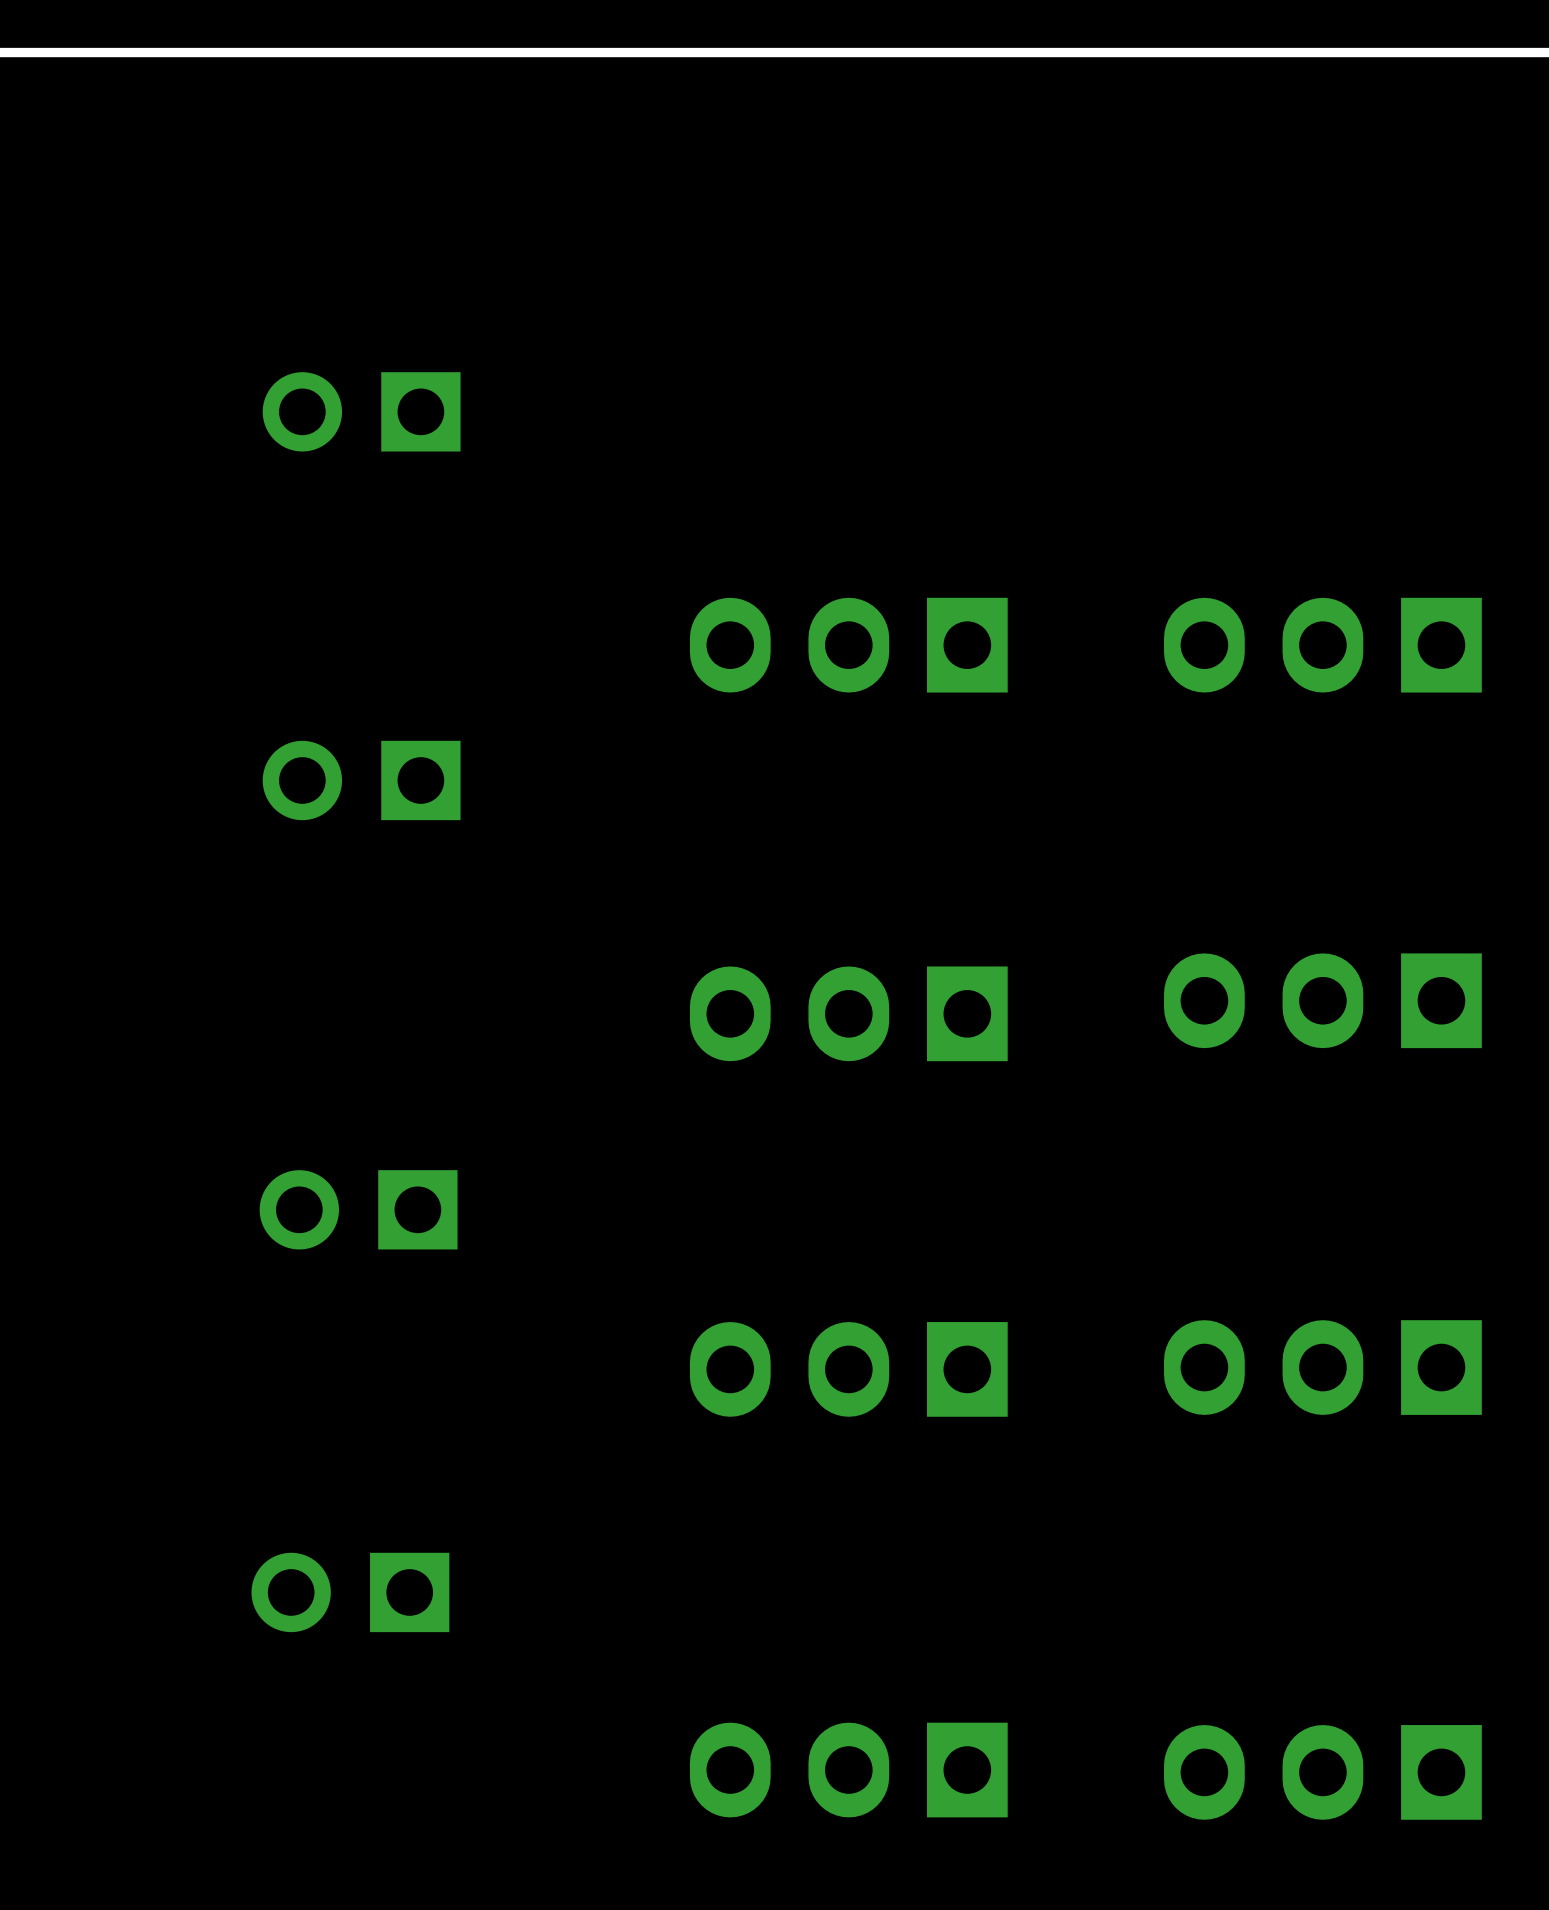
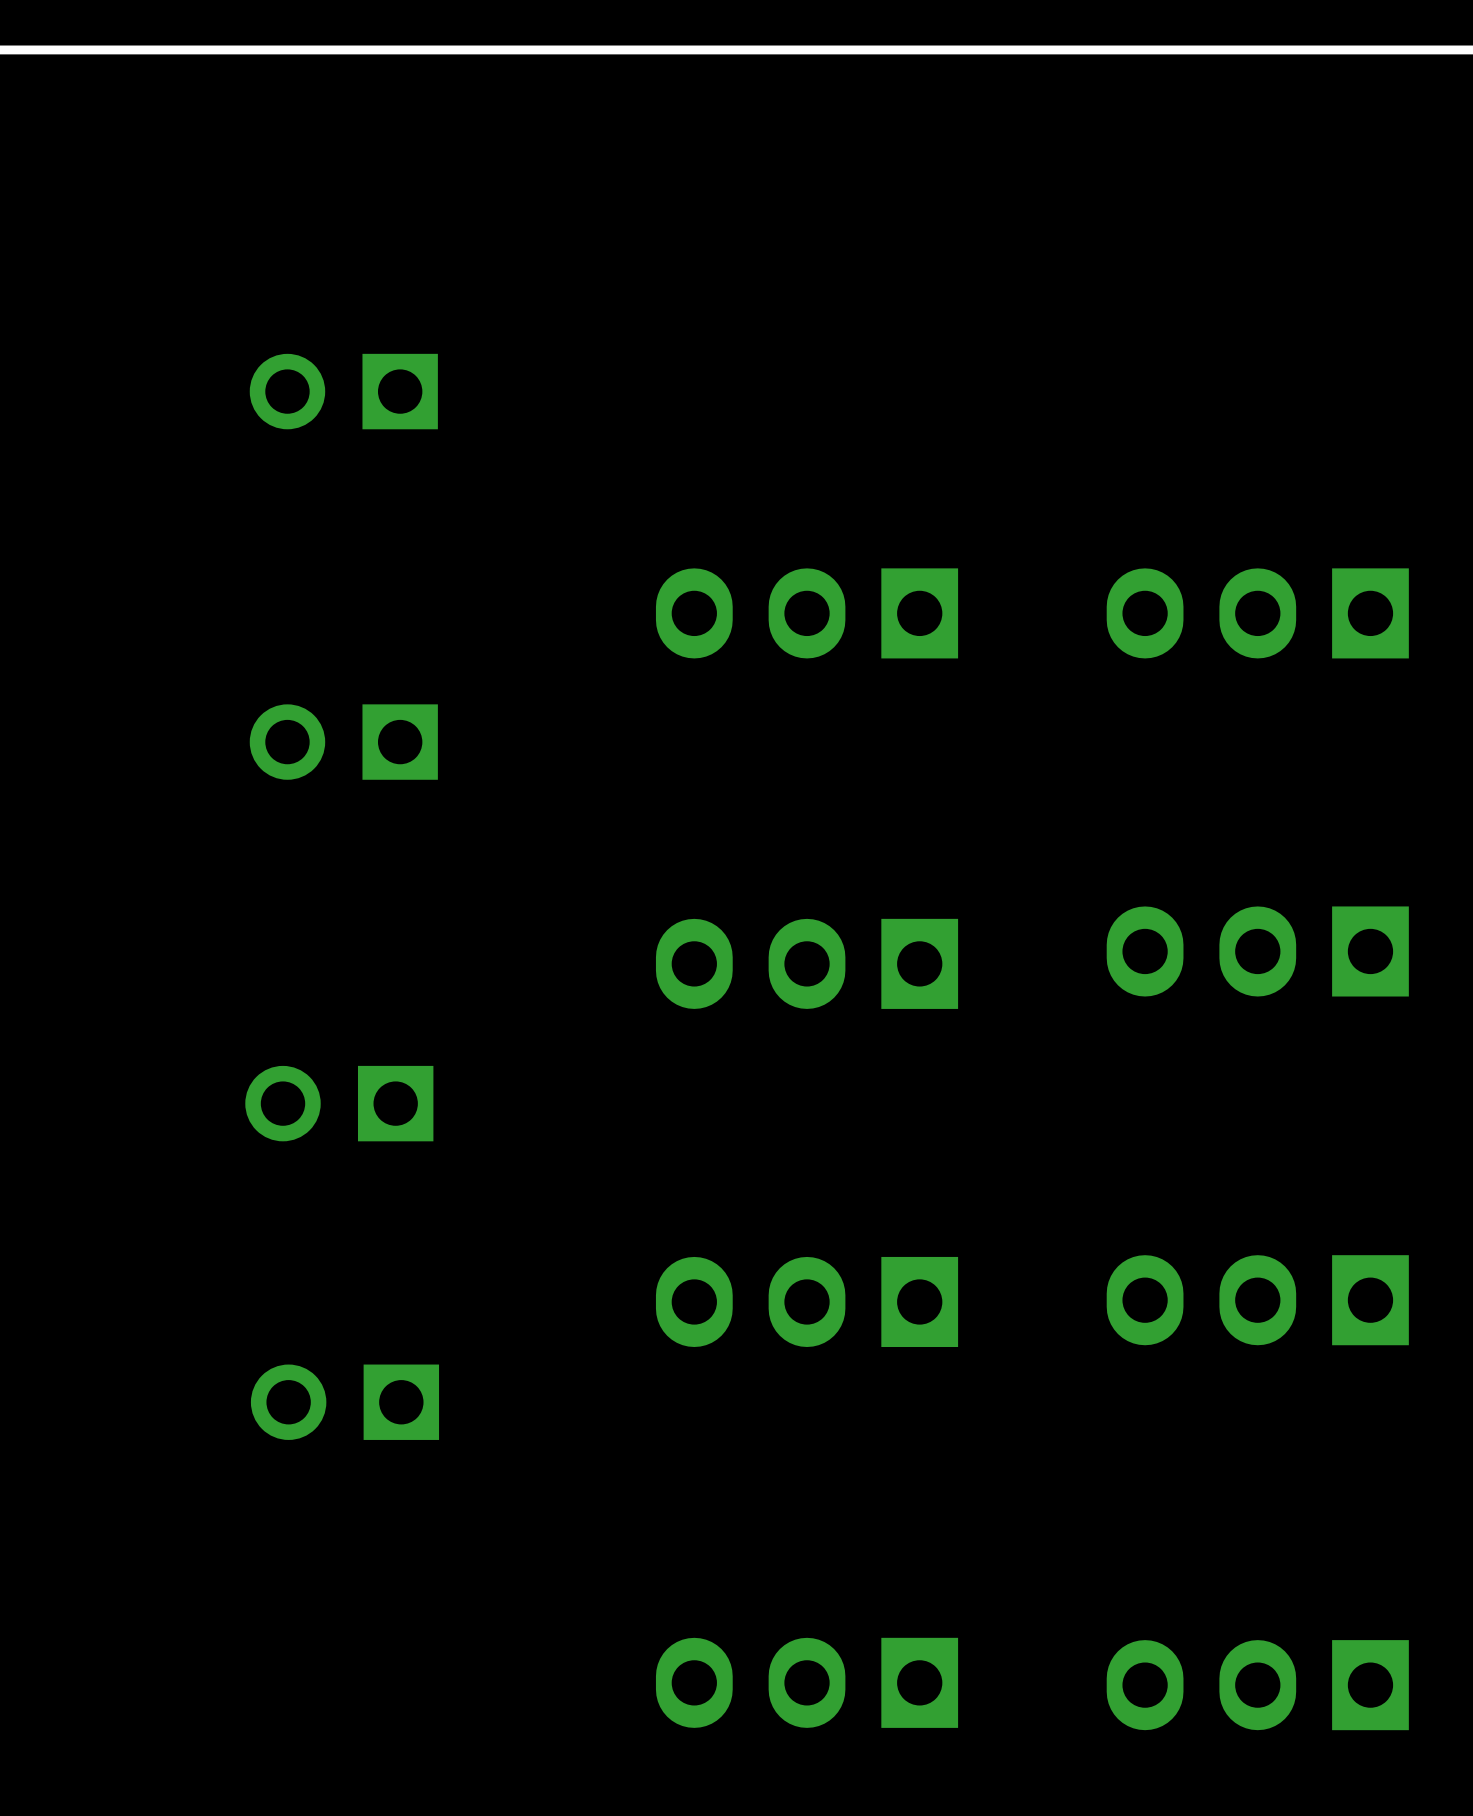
part position: (358, 1209) -> (339, 1103)
part position: (350, 1592) -> (344, 1402)

